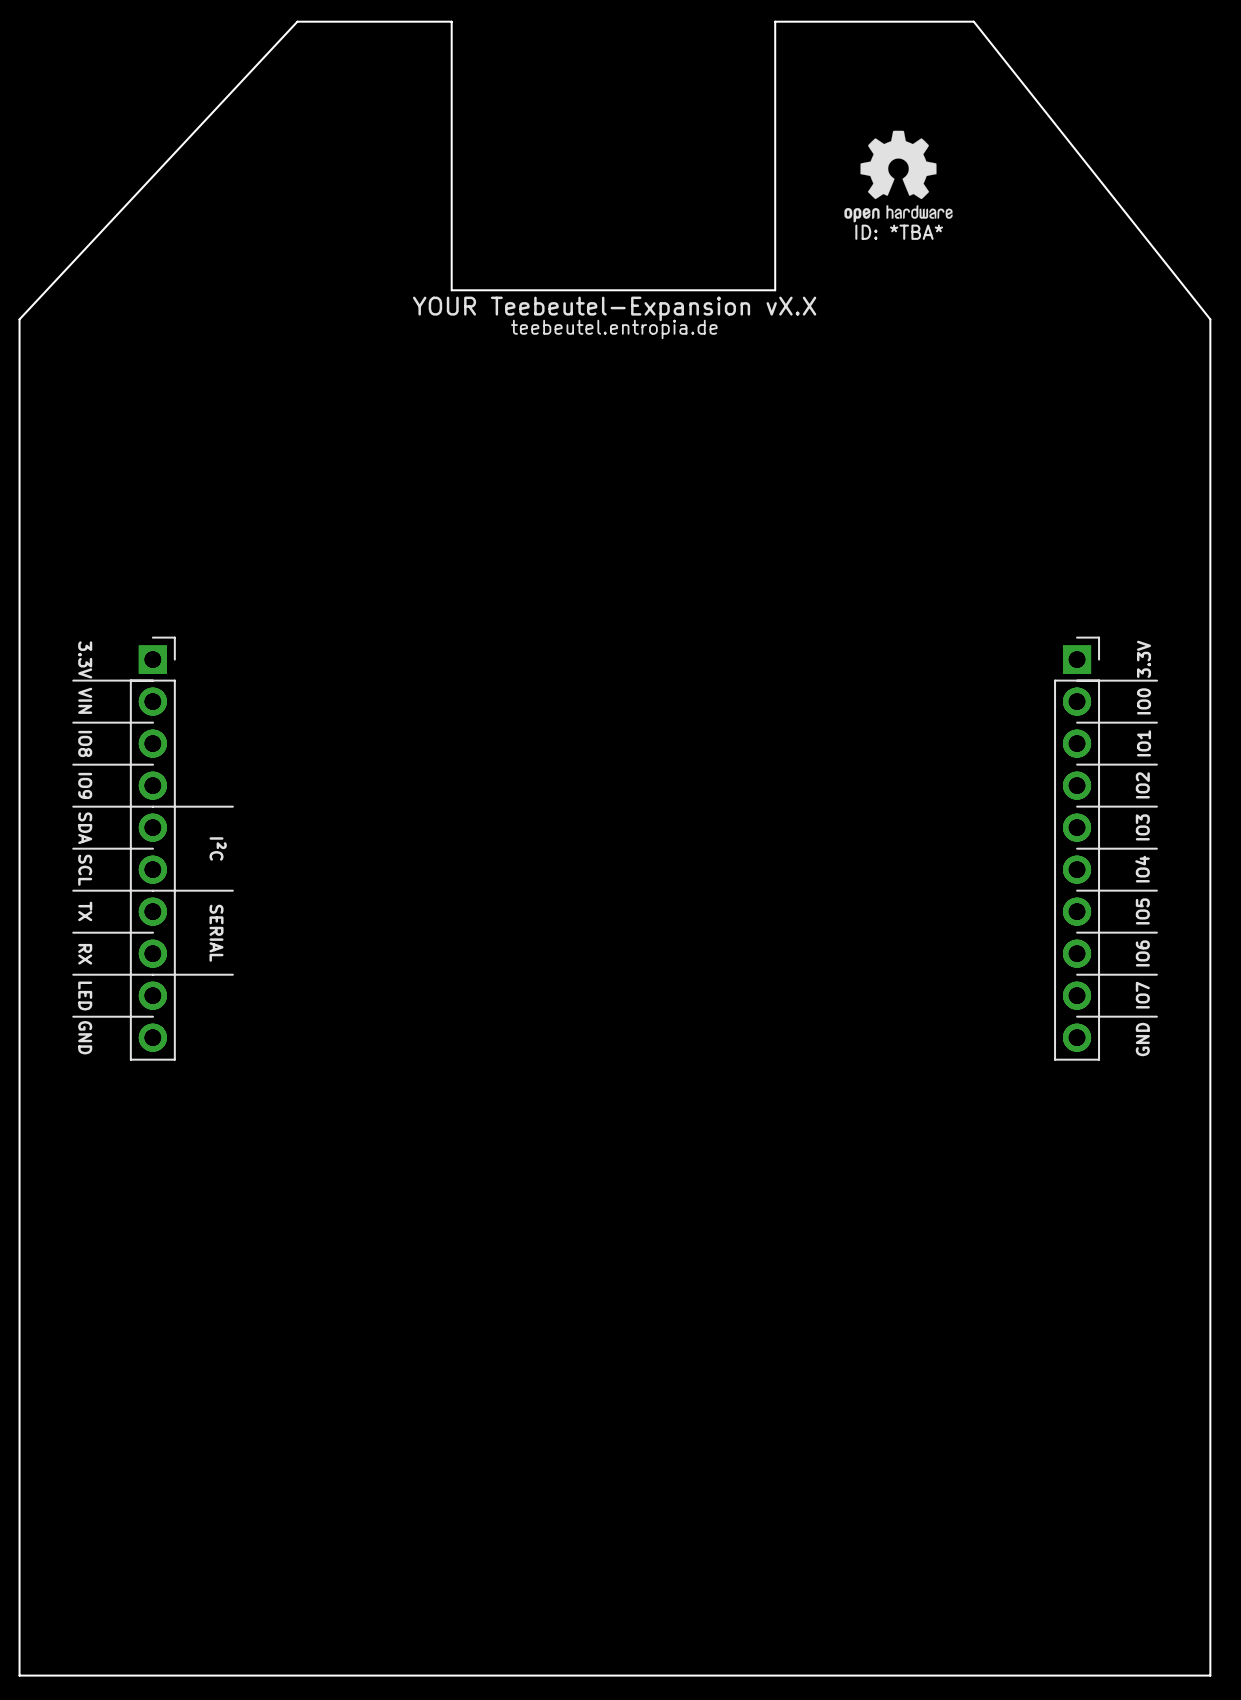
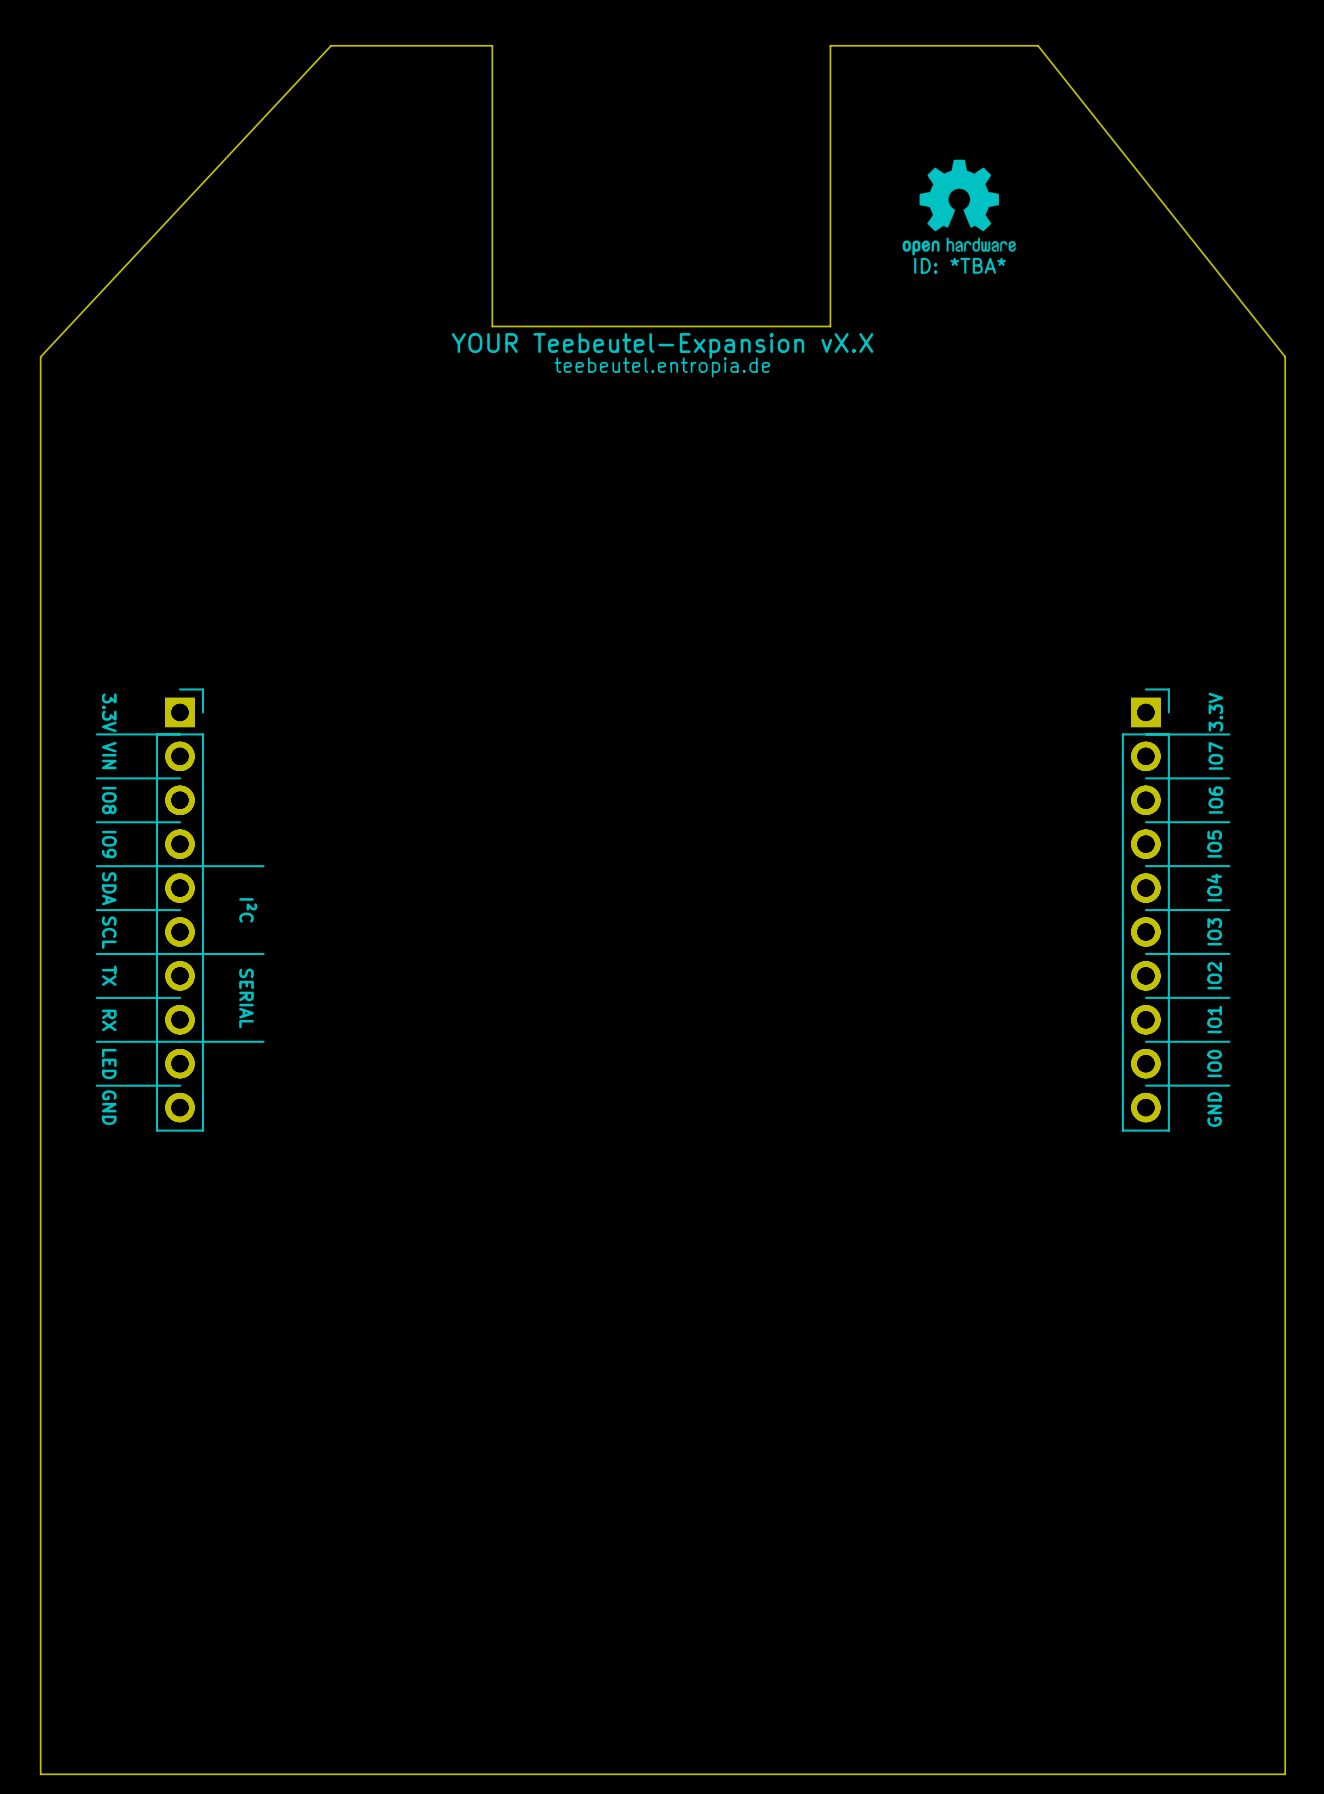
text: IO0 (1144, 701) -> IO7 (1215, 755)
text: IO1 (1144, 743) -> IO6 (1215, 800)
text: IO2 (1142, 785) -> IO5 (1214, 843)
text: IO3 (1142, 827) -> IO4 (1214, 887)
text: IO4 (1142, 869) -> IO3 (1214, 931)
text: IO5 (1142, 911) -> IO2 (1214, 975)
text: IO6 (1142, 953) -> IO1 (1214, 1019)
text: IO7 (1142, 995) -> IO0 (1214, 1063)

